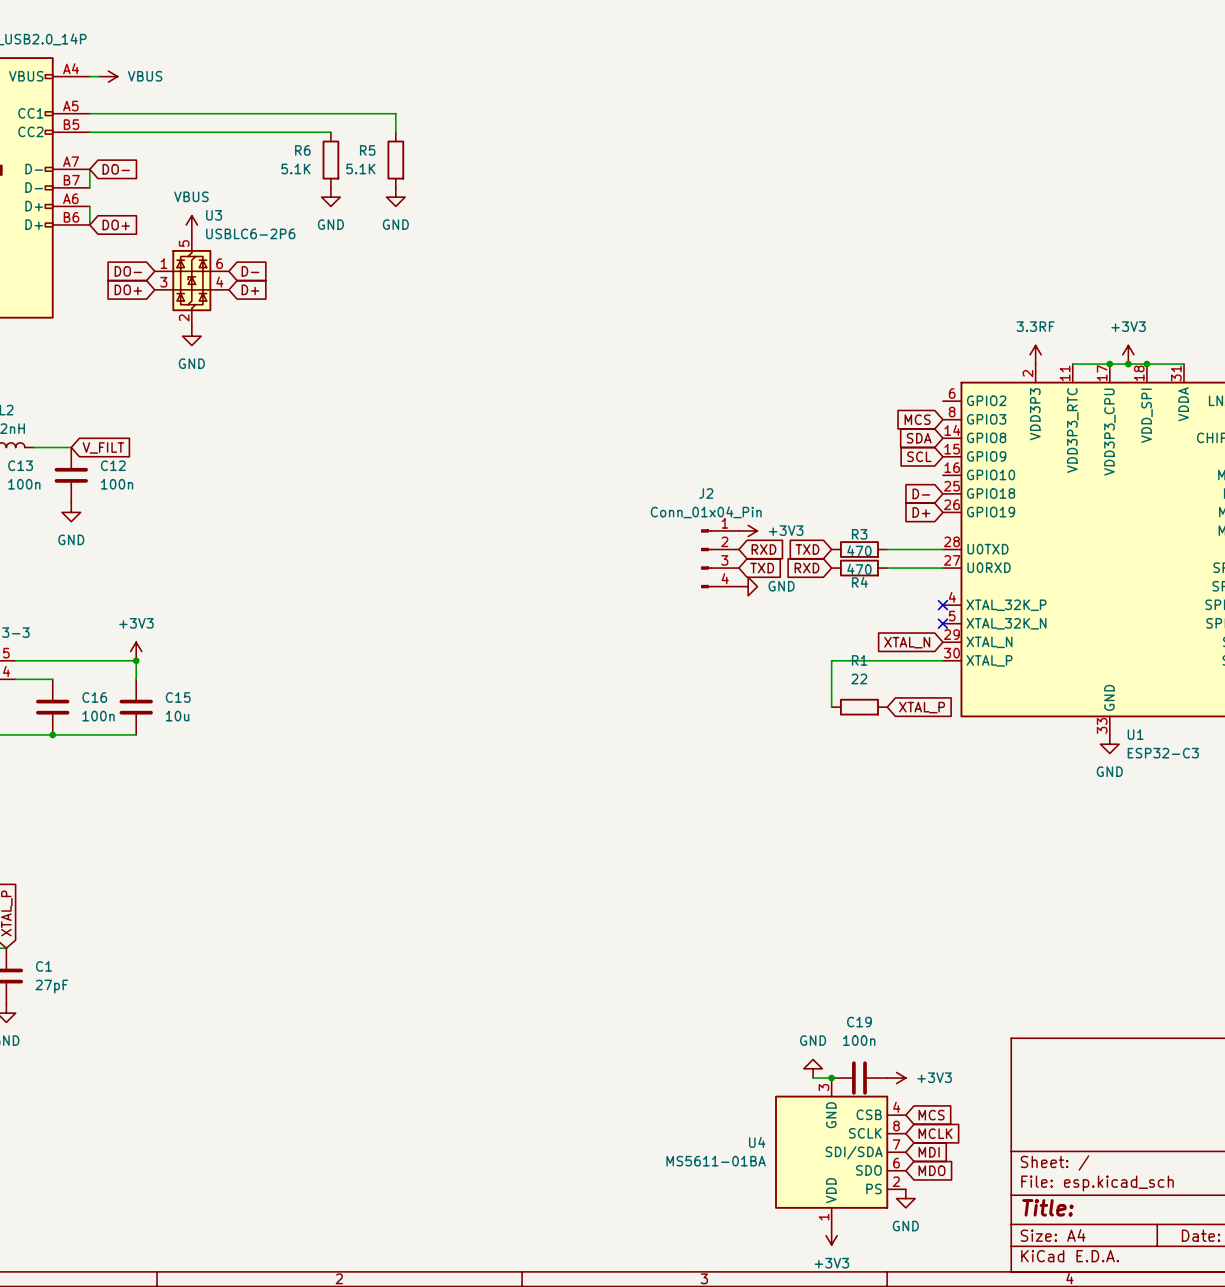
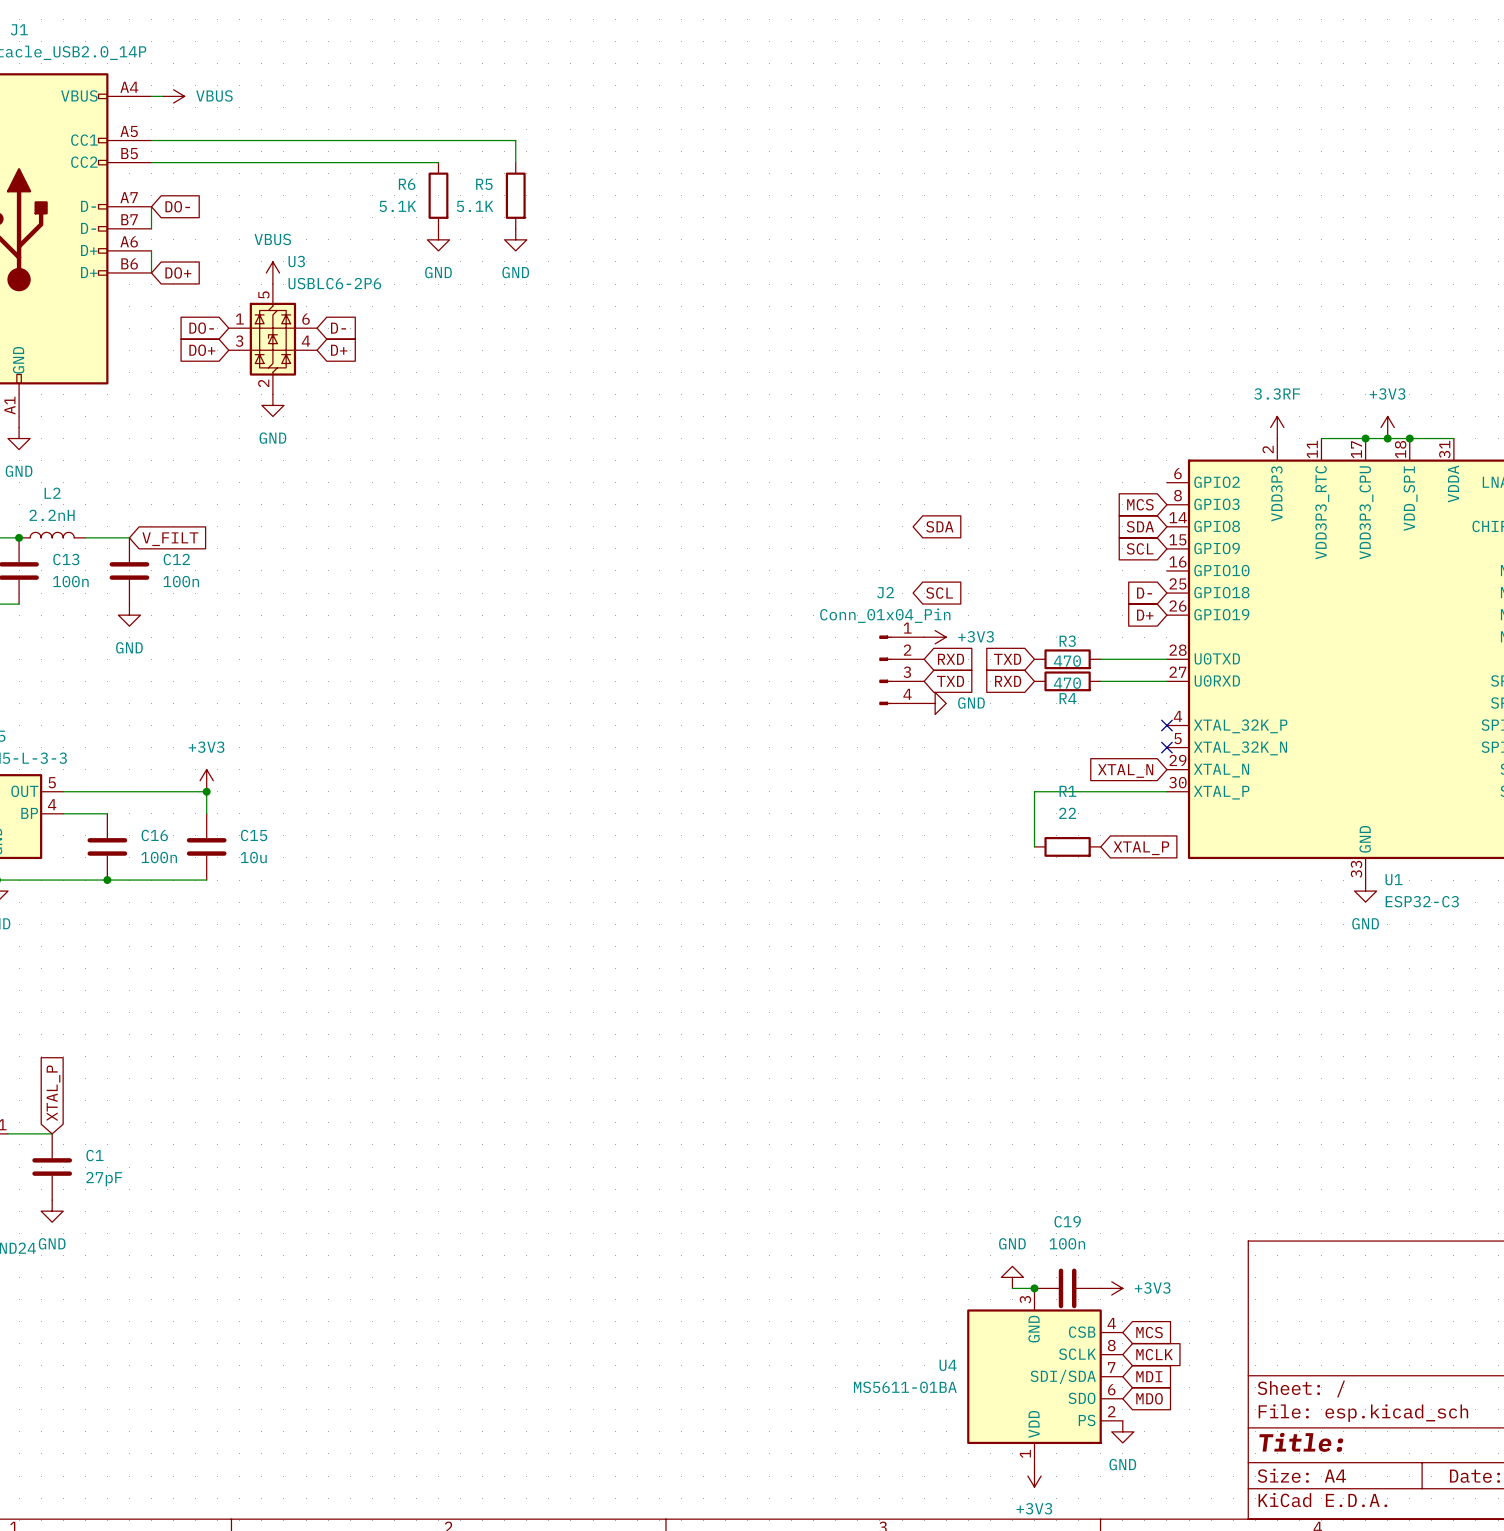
global label: none -> SDA (939, 526)
global label: none -> SCL (939, 593)

